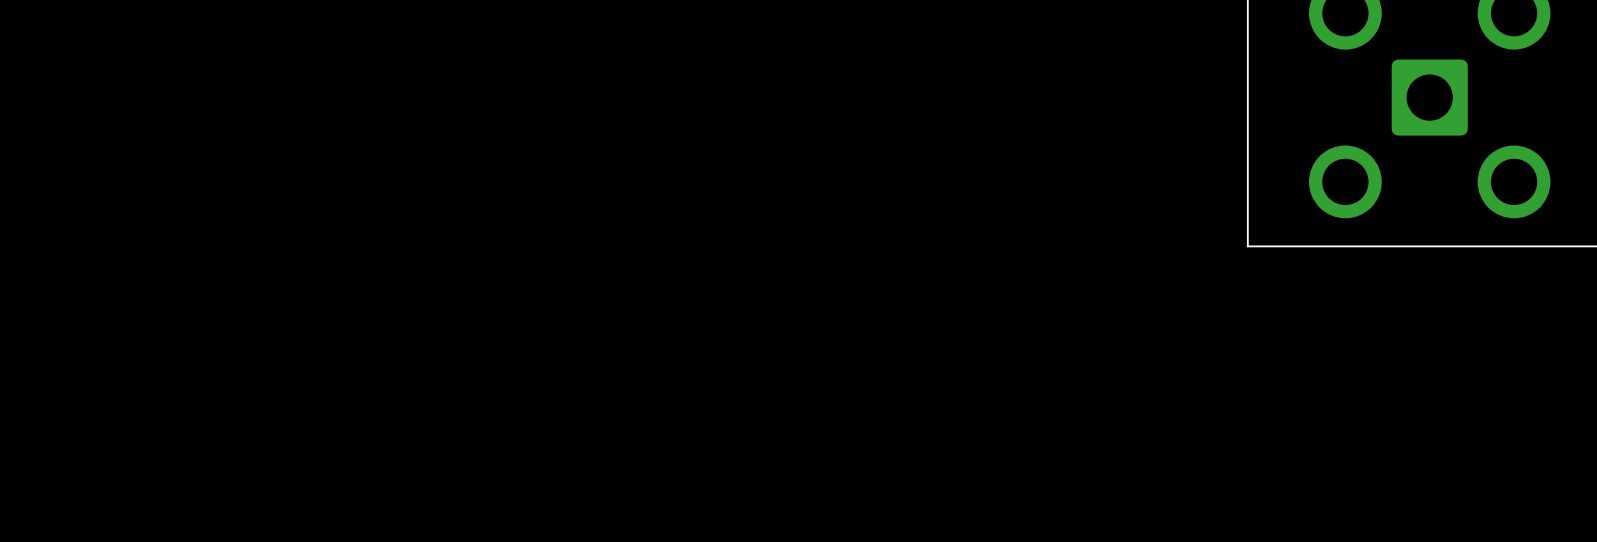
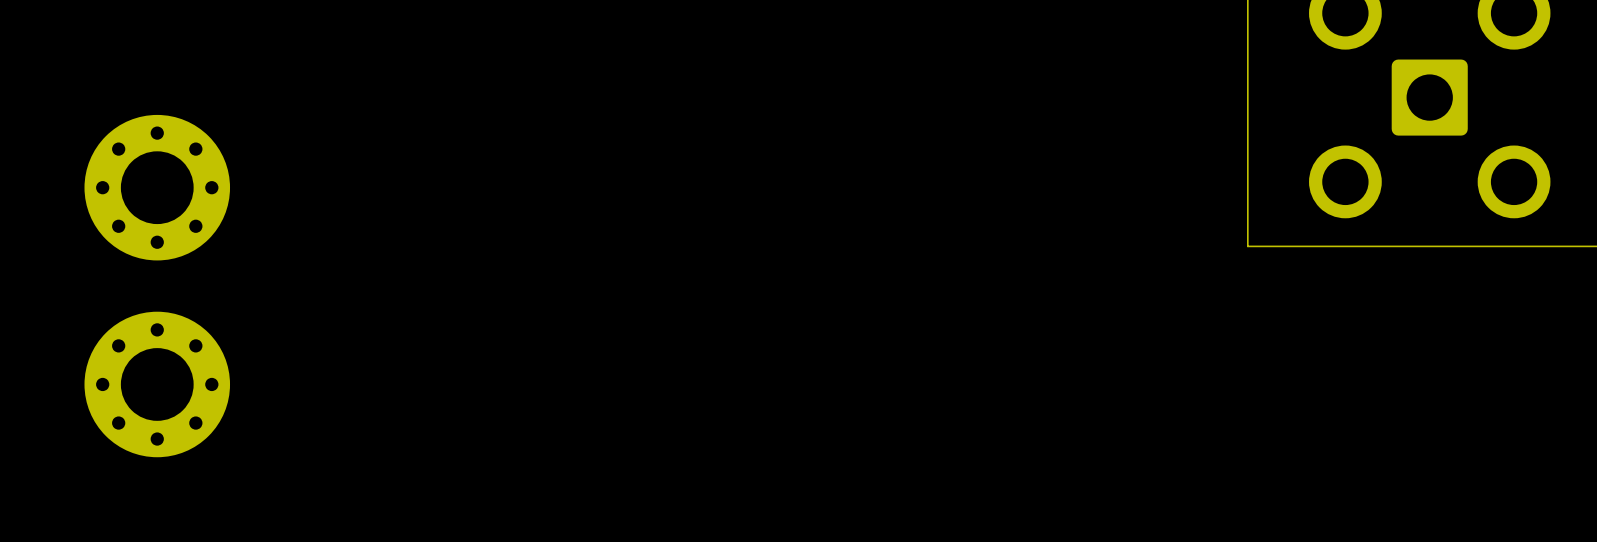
part: none -> (157, 187)
part: none -> (157, 384)

